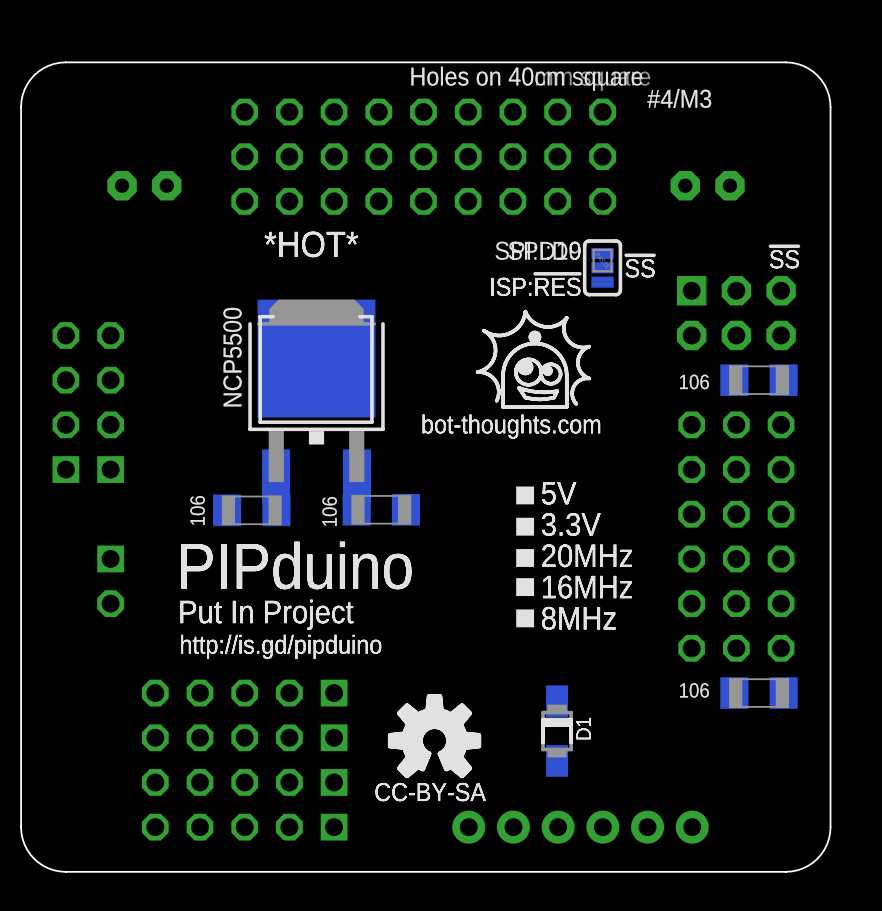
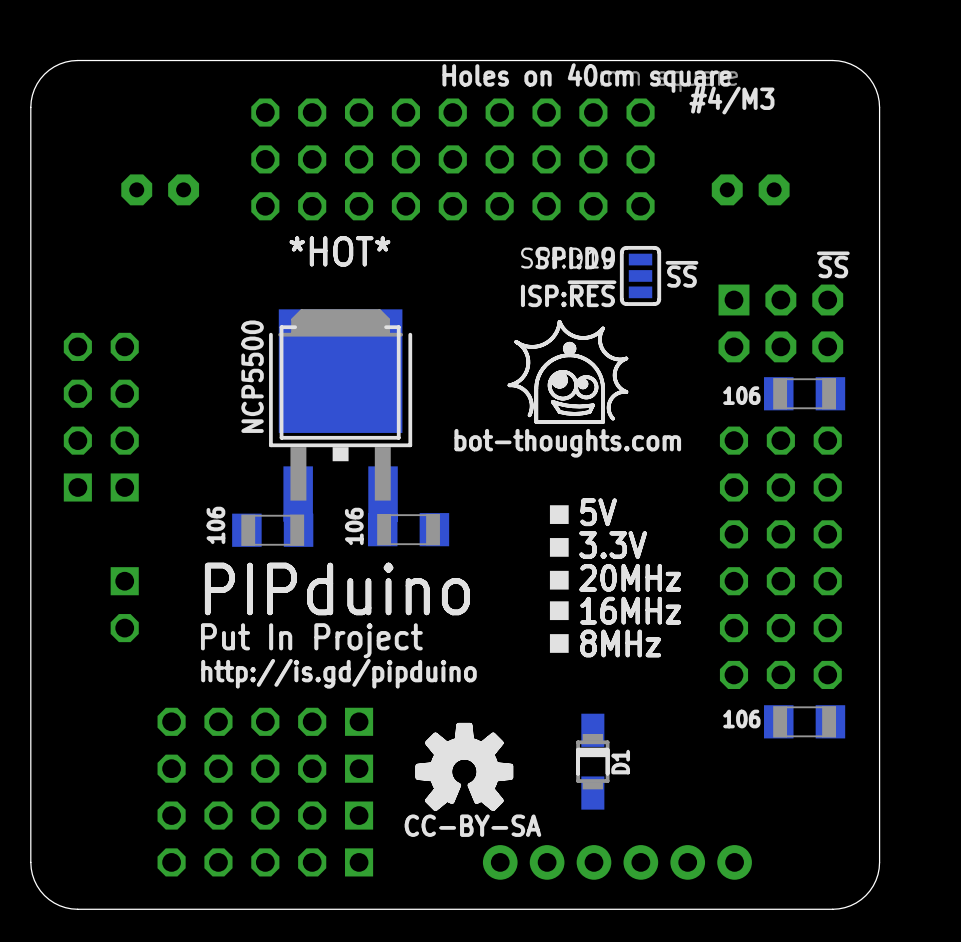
part footprint: [583, 239, 622, 296] -> [620, 246, 661, 306]

